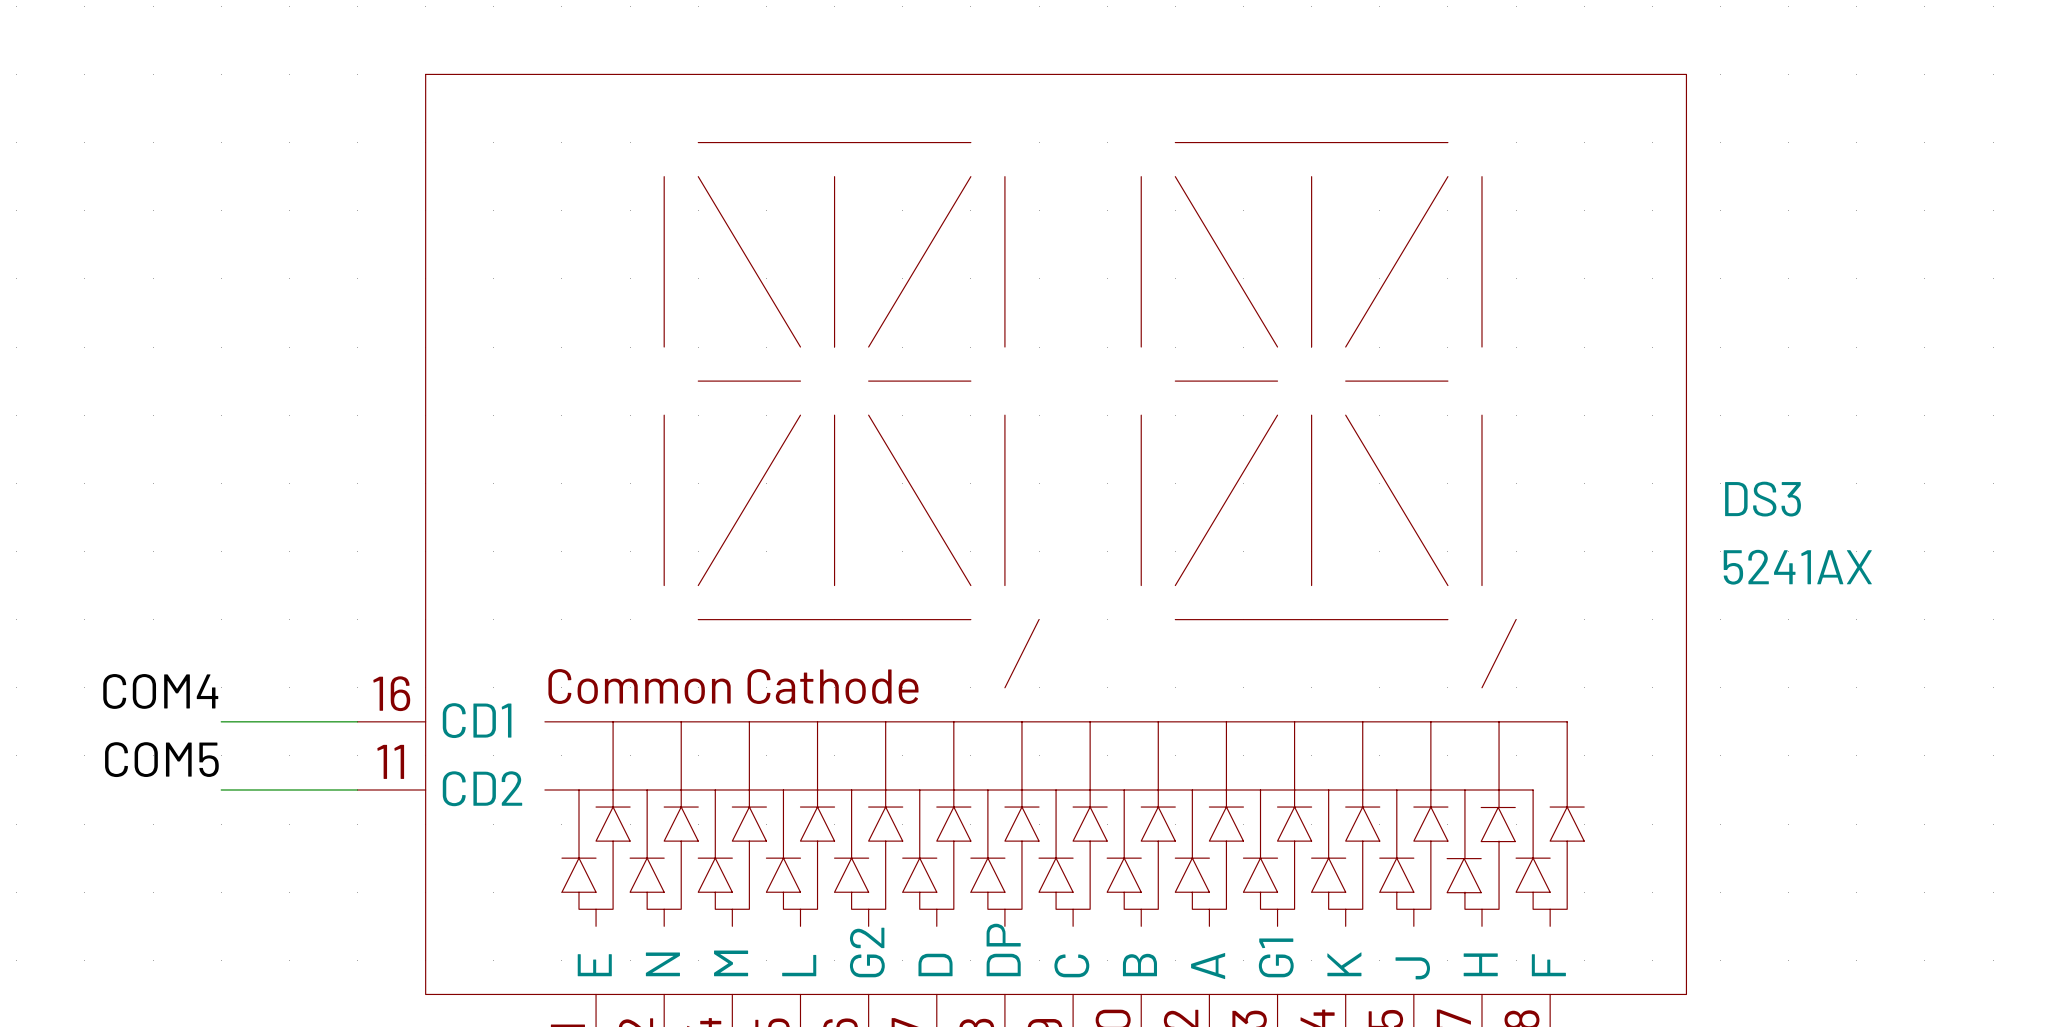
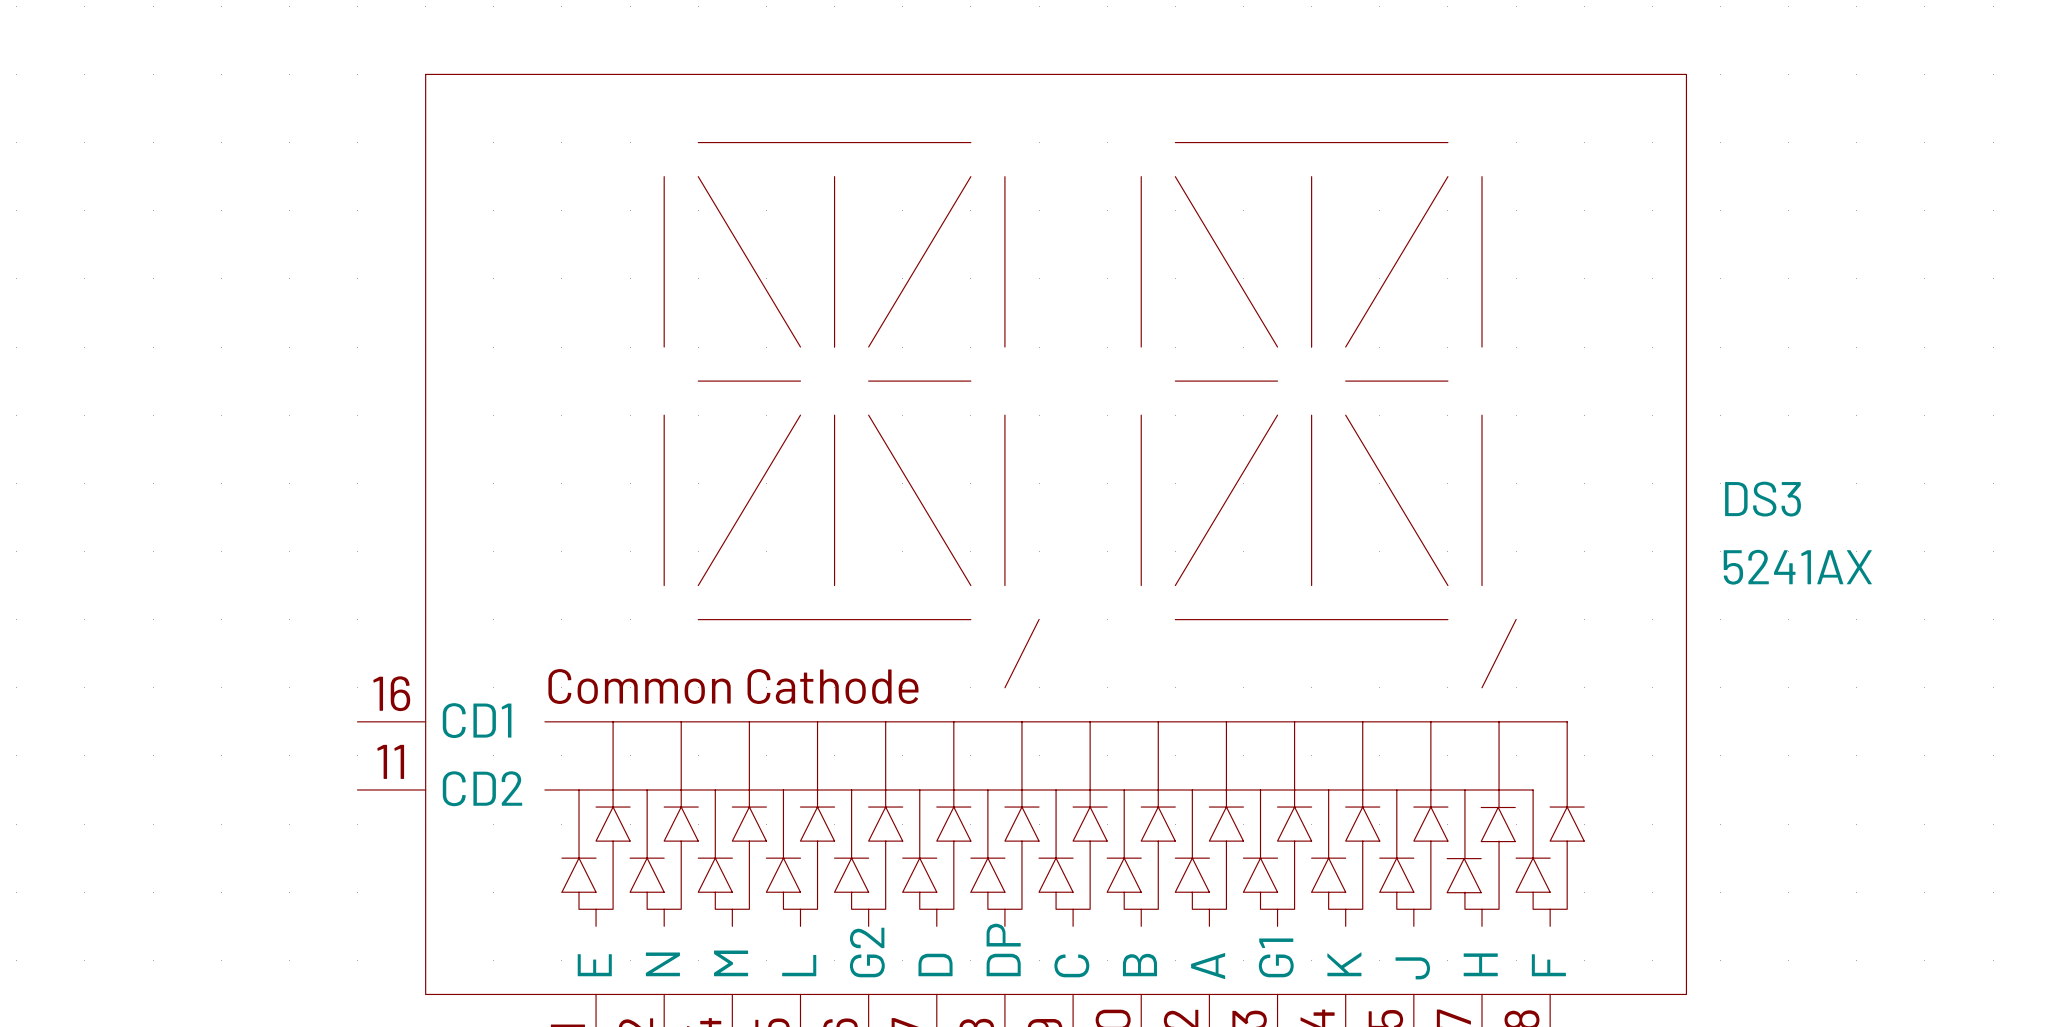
label: COM4 (160, 691) -> none
wire: (221, 721) (357, 721) -> none
label: COM5 (161, 759) -> none
wire: (221, 789) (357, 789) -> none

